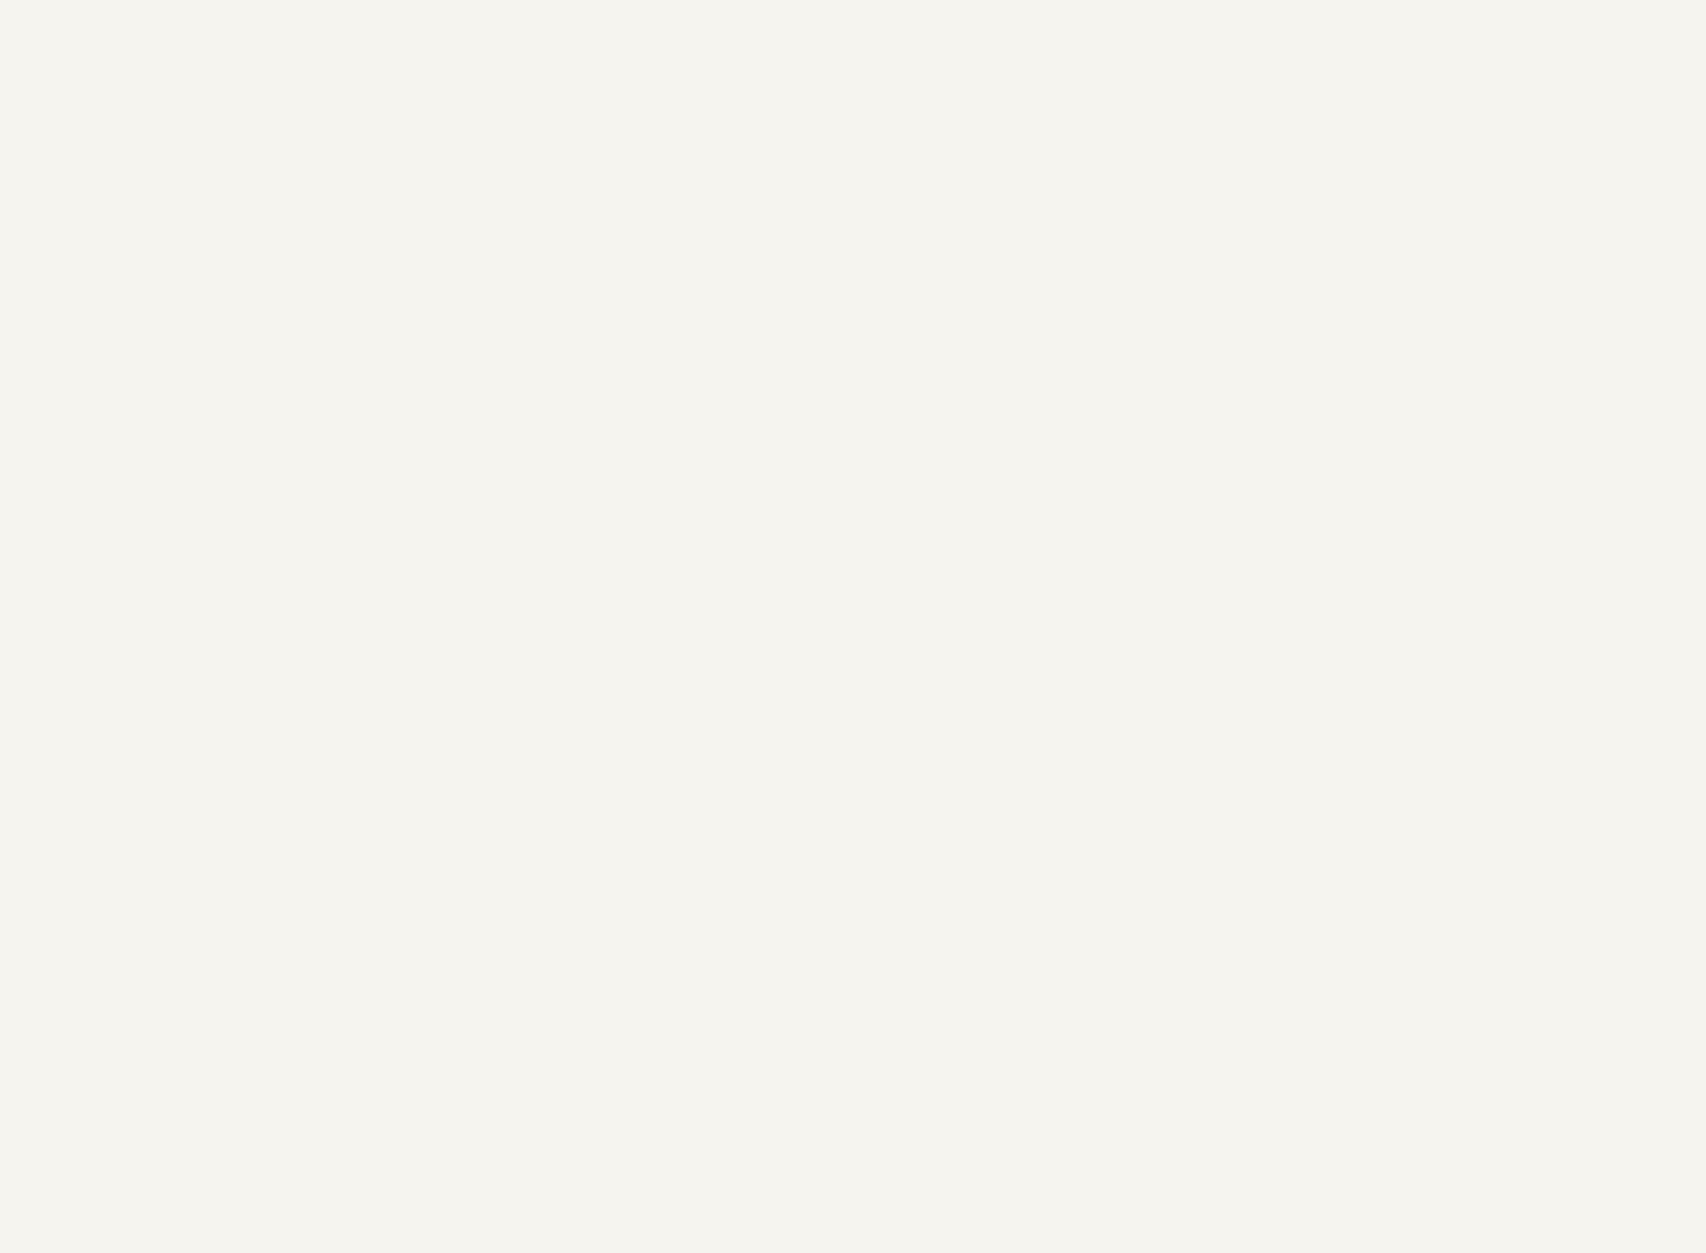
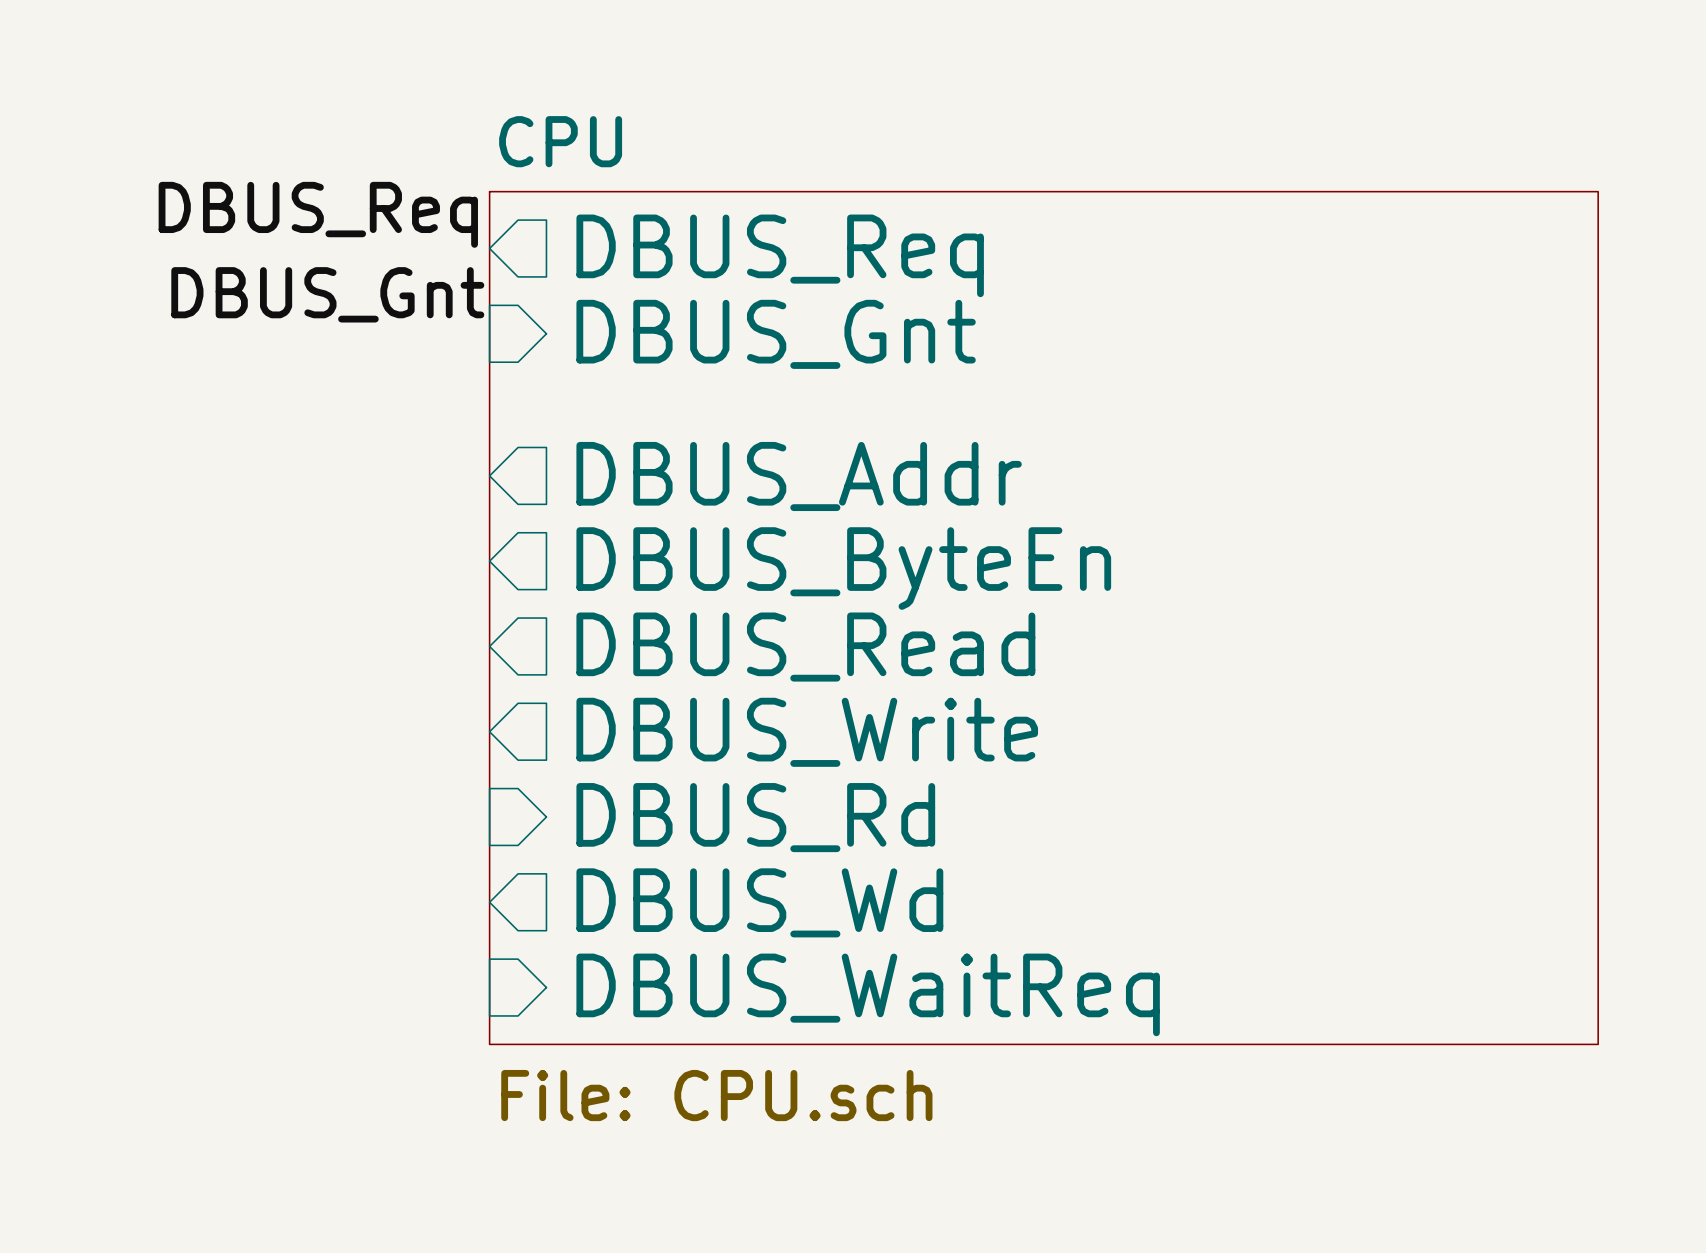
label: none -> DBUS_Req (318, 214)
sheet pin: none -> DBUS_Req (780, 255)
label: none -> DBUS_Gnt (327, 294)
sheet pin: none -> DBUS_Gnt (776, 334)
sheet pin: none -> DBUS_Addr (799, 476)
sheet pin: none -> DBUS_ByteEn (843, 568)
sheet CPU: none -> File: CPU.sch (1043, 618)
sheet pin: none -> DBUS_Read (805, 647)
sheet pin: none -> DBUS_Write (807, 732)
sheet pin: none -> DBUS_Rd (755, 817)
sheet pin: none -> DBUS_Wd (759, 902)
sheet pin: none -> DBUS_WaitReq (868, 994)

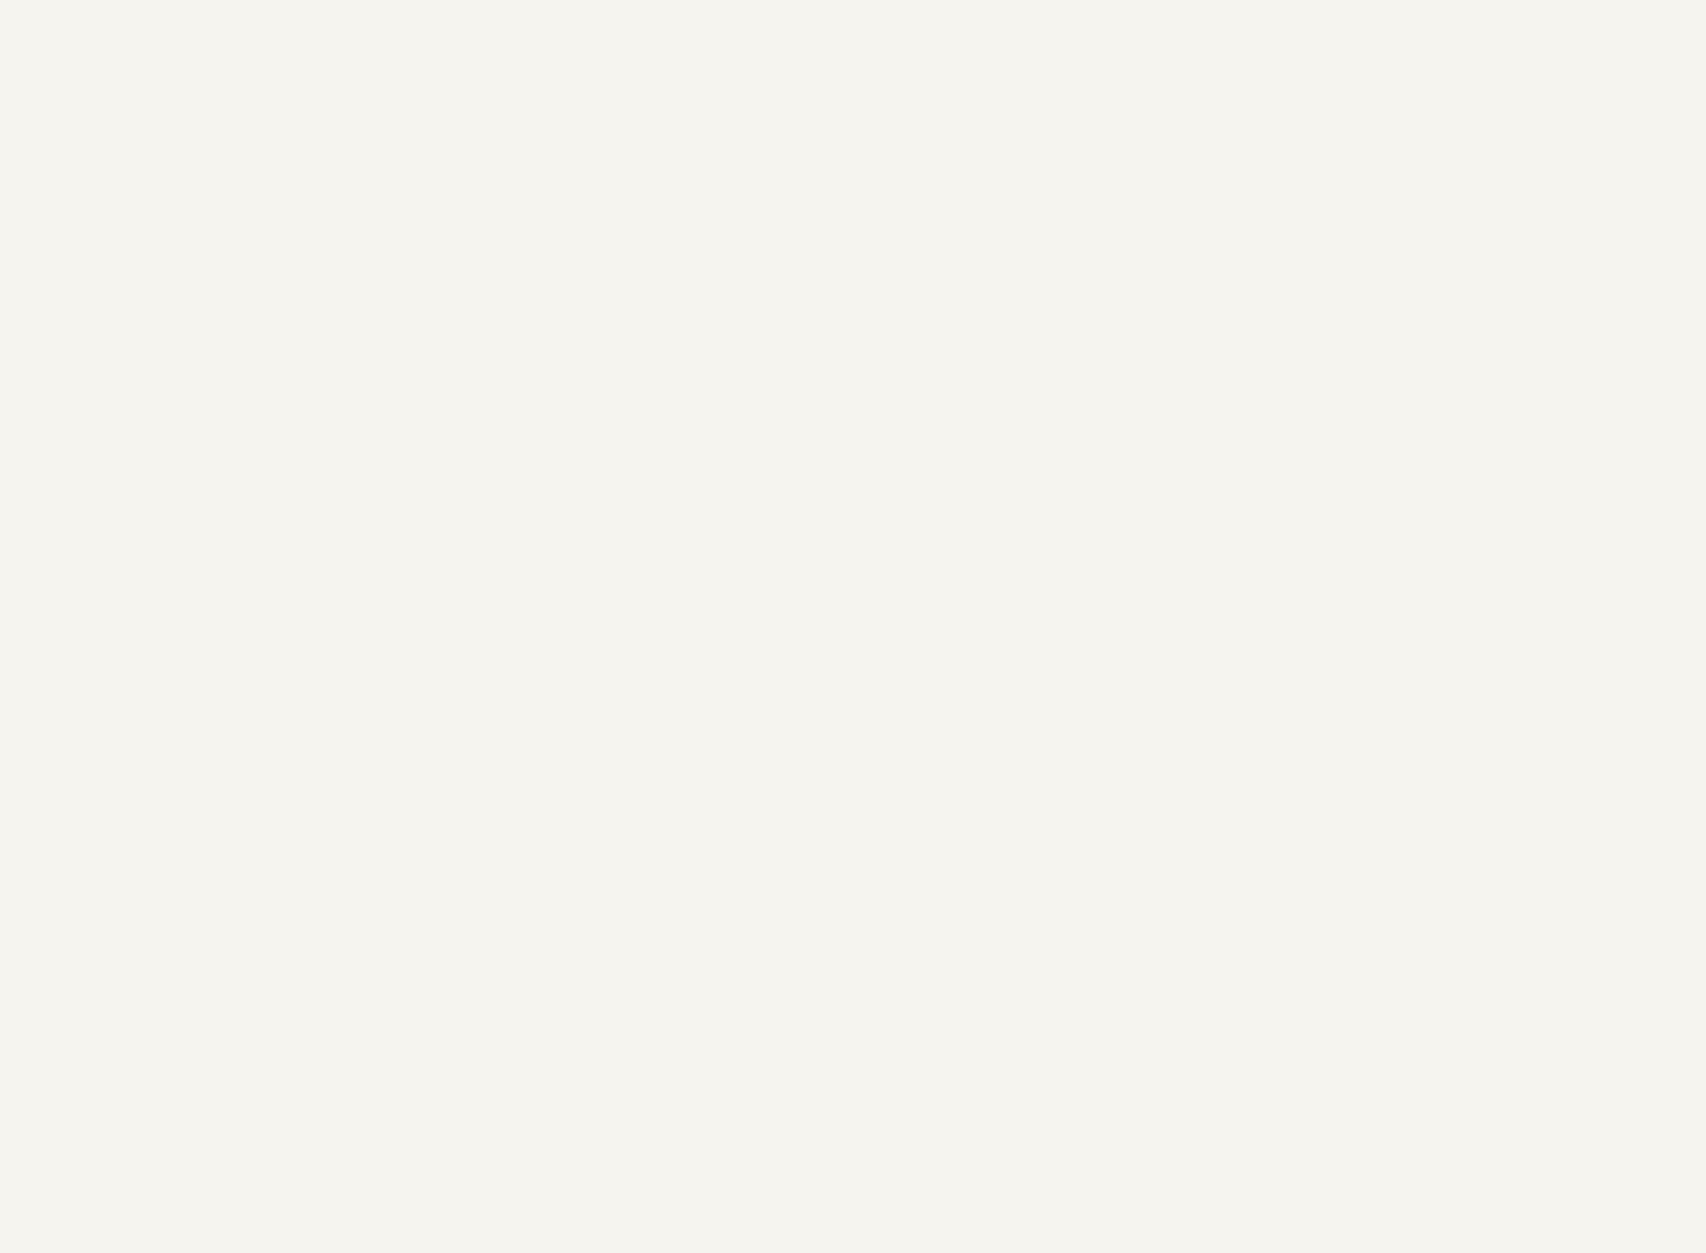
label: DBUS_Req (318, 214) -> none
sheet pin: DBUS_Req (780, 255) -> none
label: DBUS_Gnt (327, 294) -> none
sheet pin: DBUS_Gnt (776, 334) -> none
sheet pin: DBUS_Addr (799, 476) -> none
sheet pin: DBUS_ByteEn (843, 568) -> none
sheet CPU: File: CPU.sch (1043, 618) -> none
sheet pin: DBUS_Read (805, 647) -> none
sheet pin: DBUS_Write (807, 732) -> none
sheet pin: DBUS_Rd (755, 817) -> none
sheet pin: DBUS_Wd (759, 902) -> none
sheet pin: DBUS_WaitReq (868, 994) -> none

